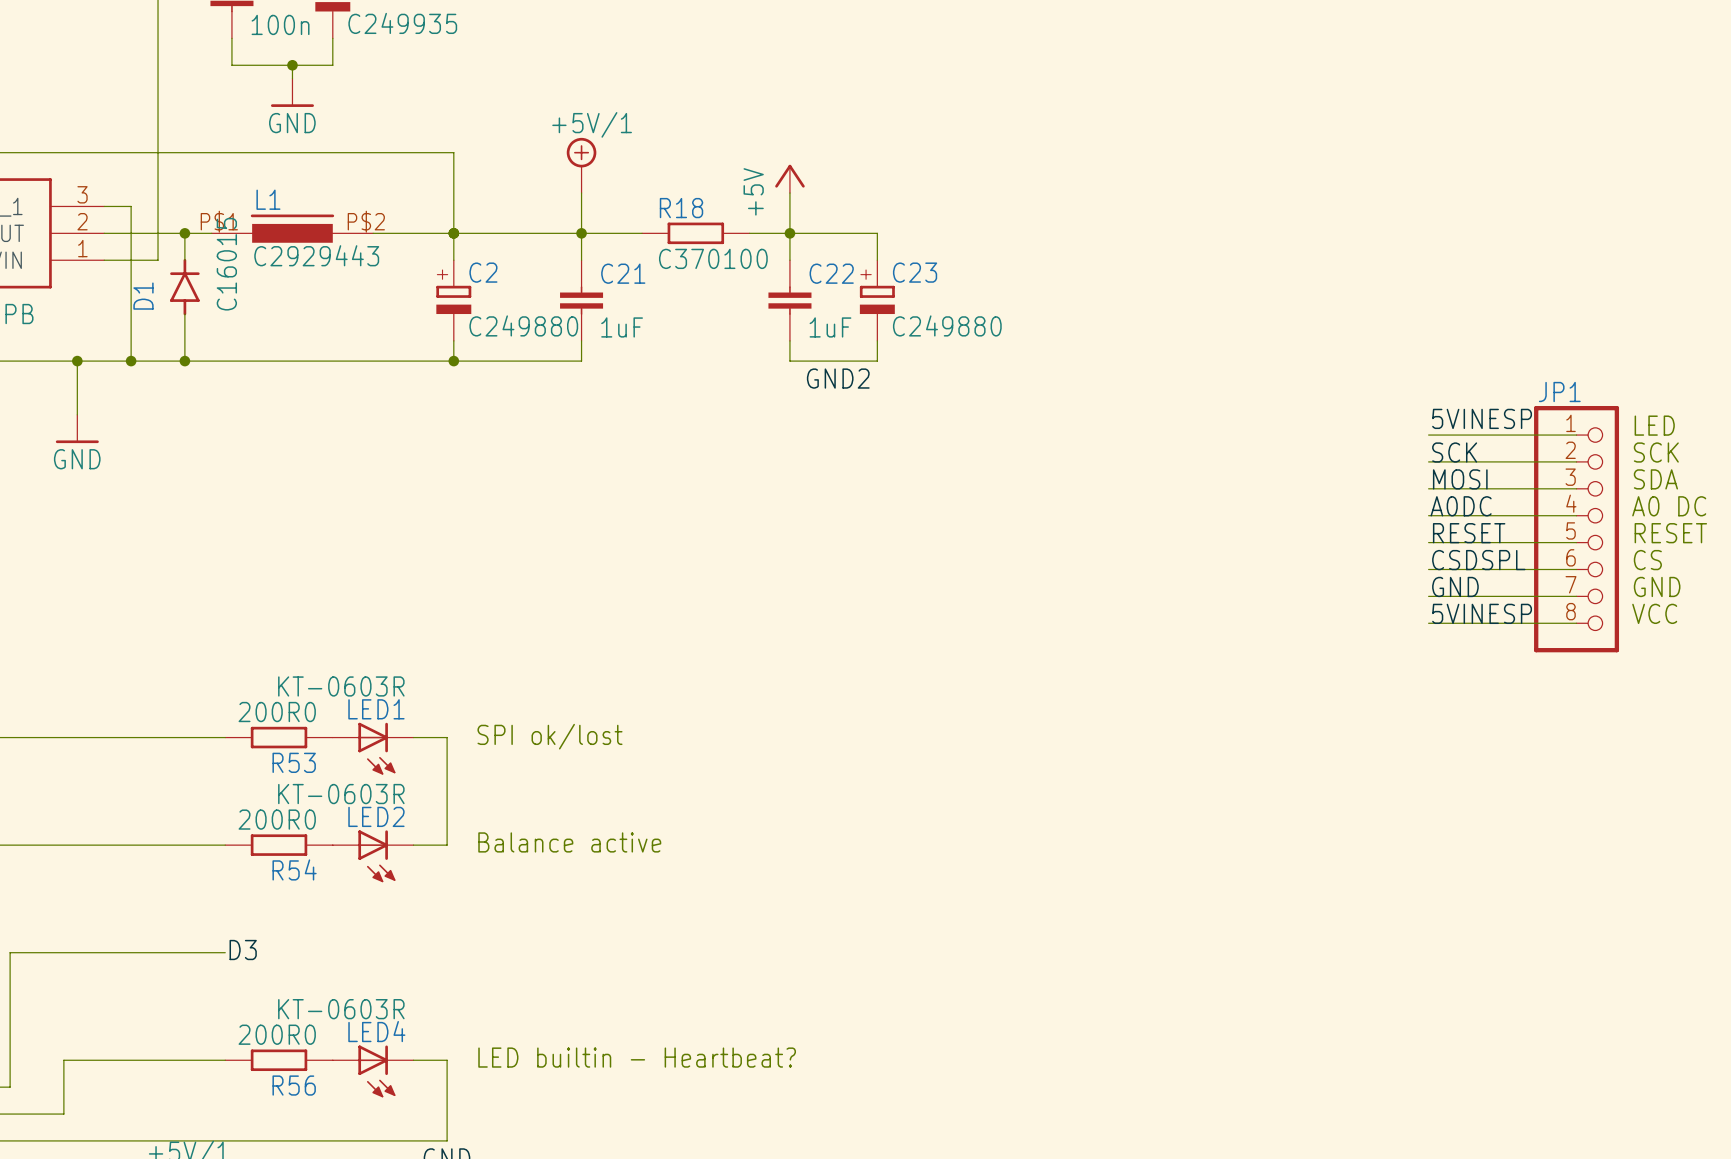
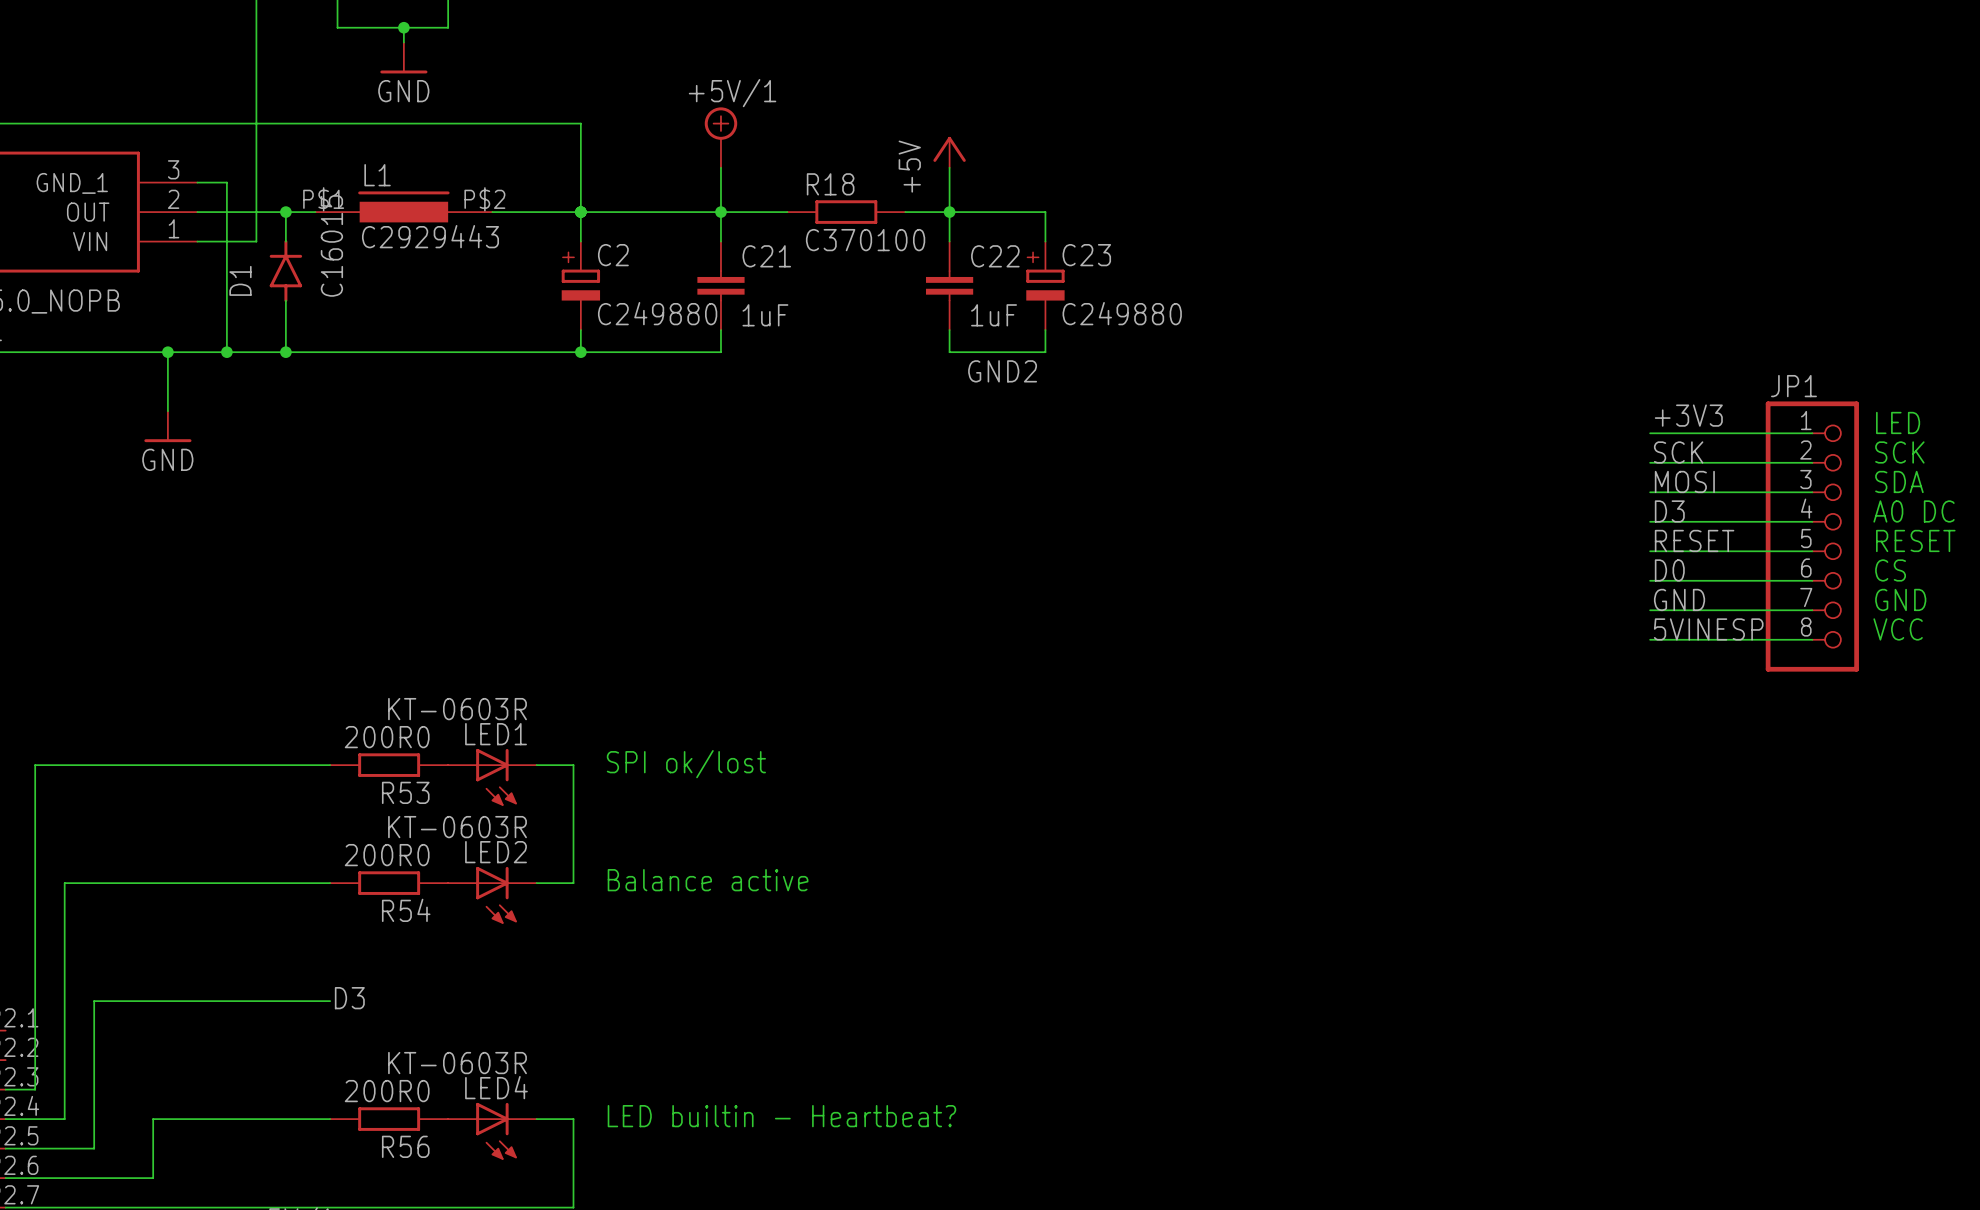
label: 5VINESP (1482, 418) -> +3V3 (1688, 415)
label: A0DC (1461, 506) -> D3 (1669, 511)
label: CSDSPL (1478, 560) -> D0 (1669, 570)

